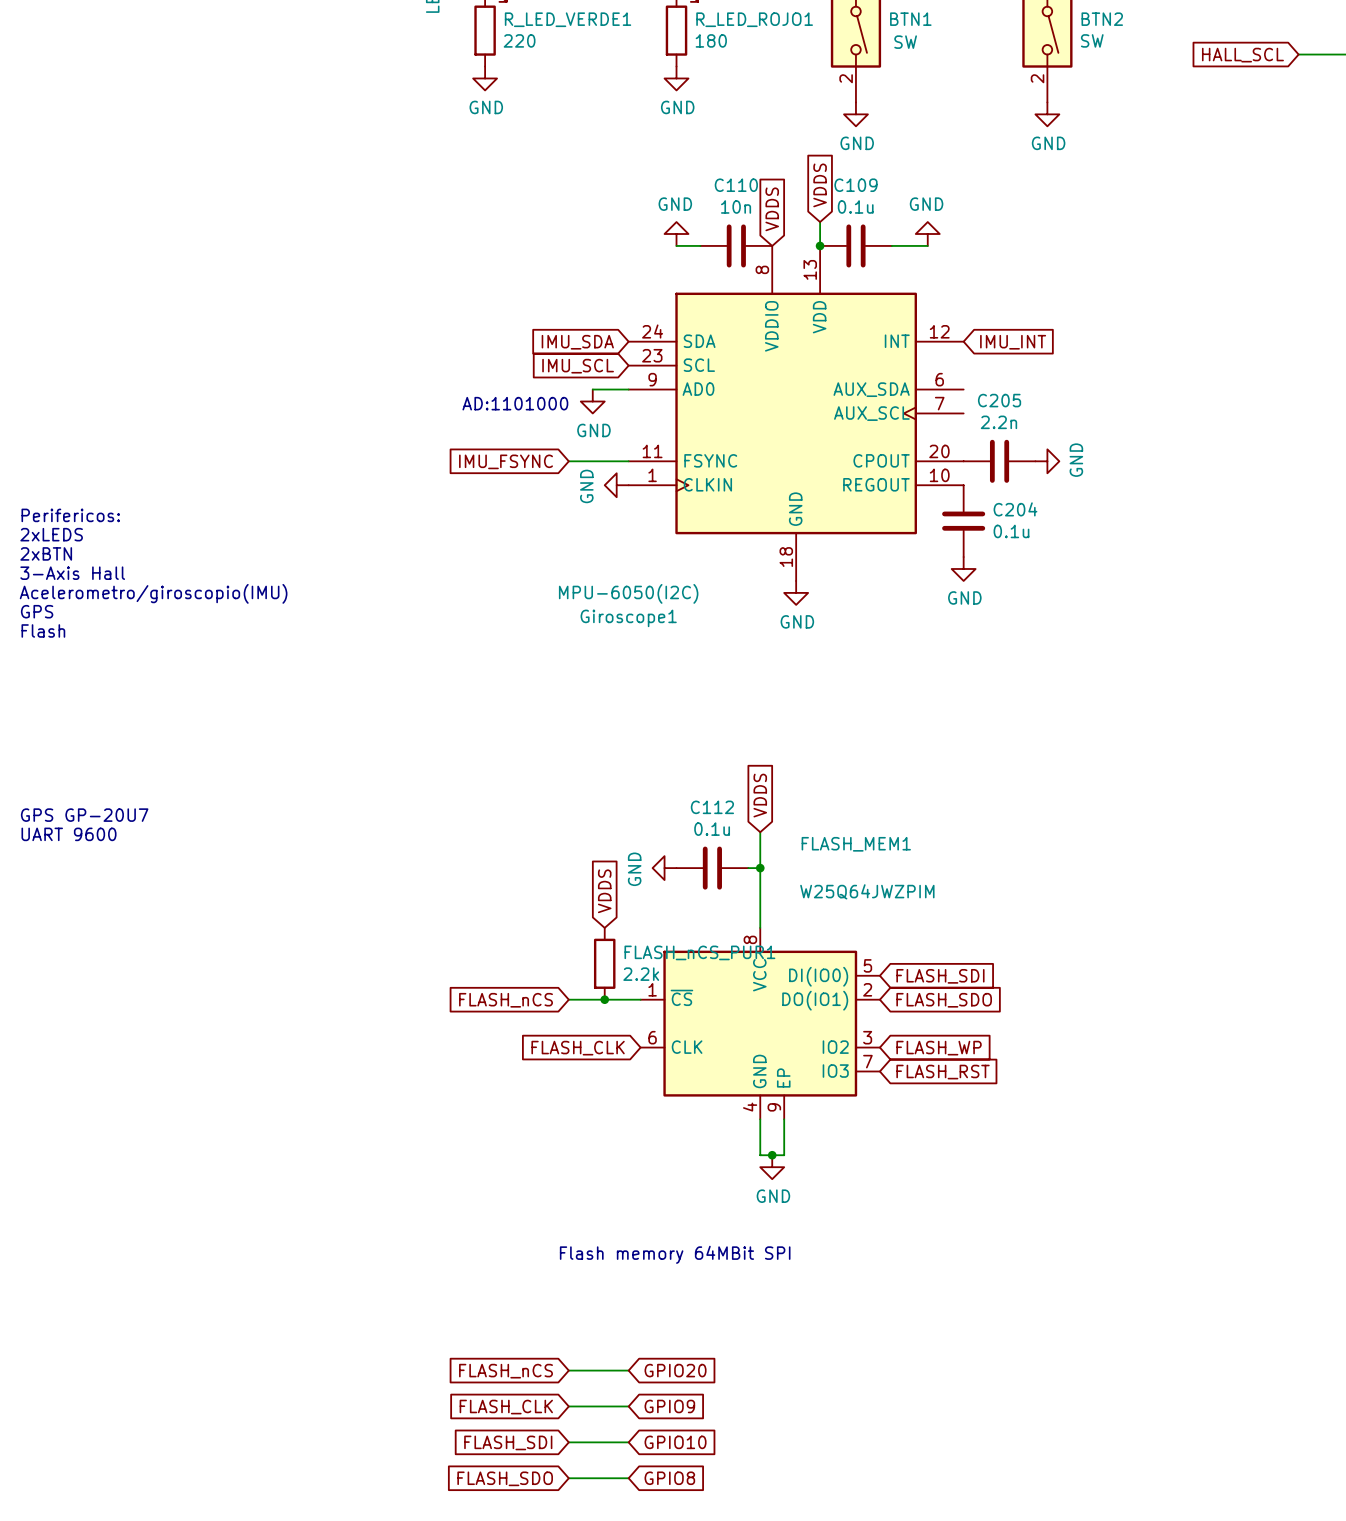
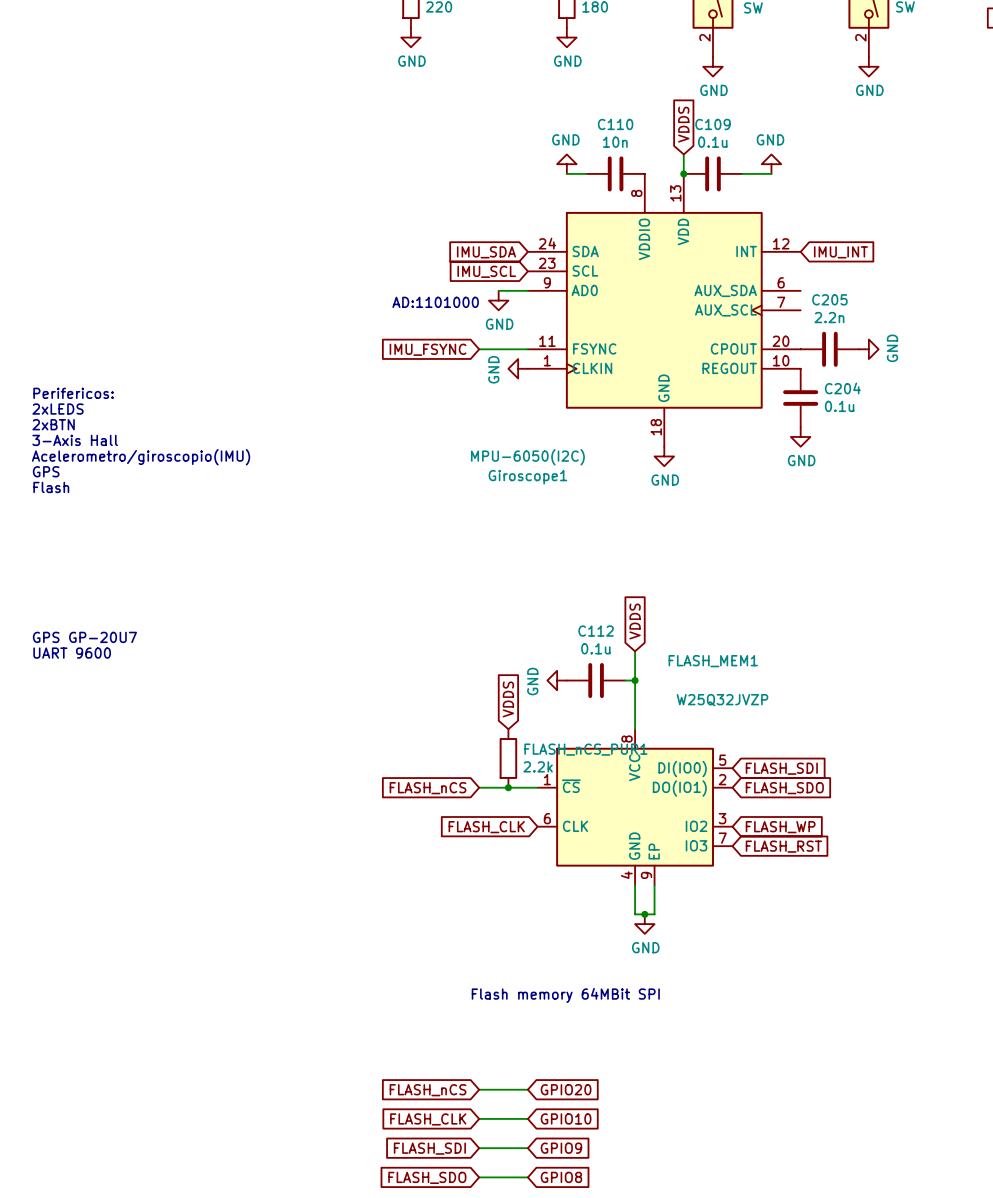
global label: VDDS (772, 209) -> none
FLASH_MEM1 value: W25Q64JWZPIM (867, 891) -> W25Q32JVZP (722, 700)
global label: GPIO9 (669, 1406) -> GPIO10 (566, 1118)
global label: GPIO10 (675, 1442) -> GPIO9 (561, 1148)

